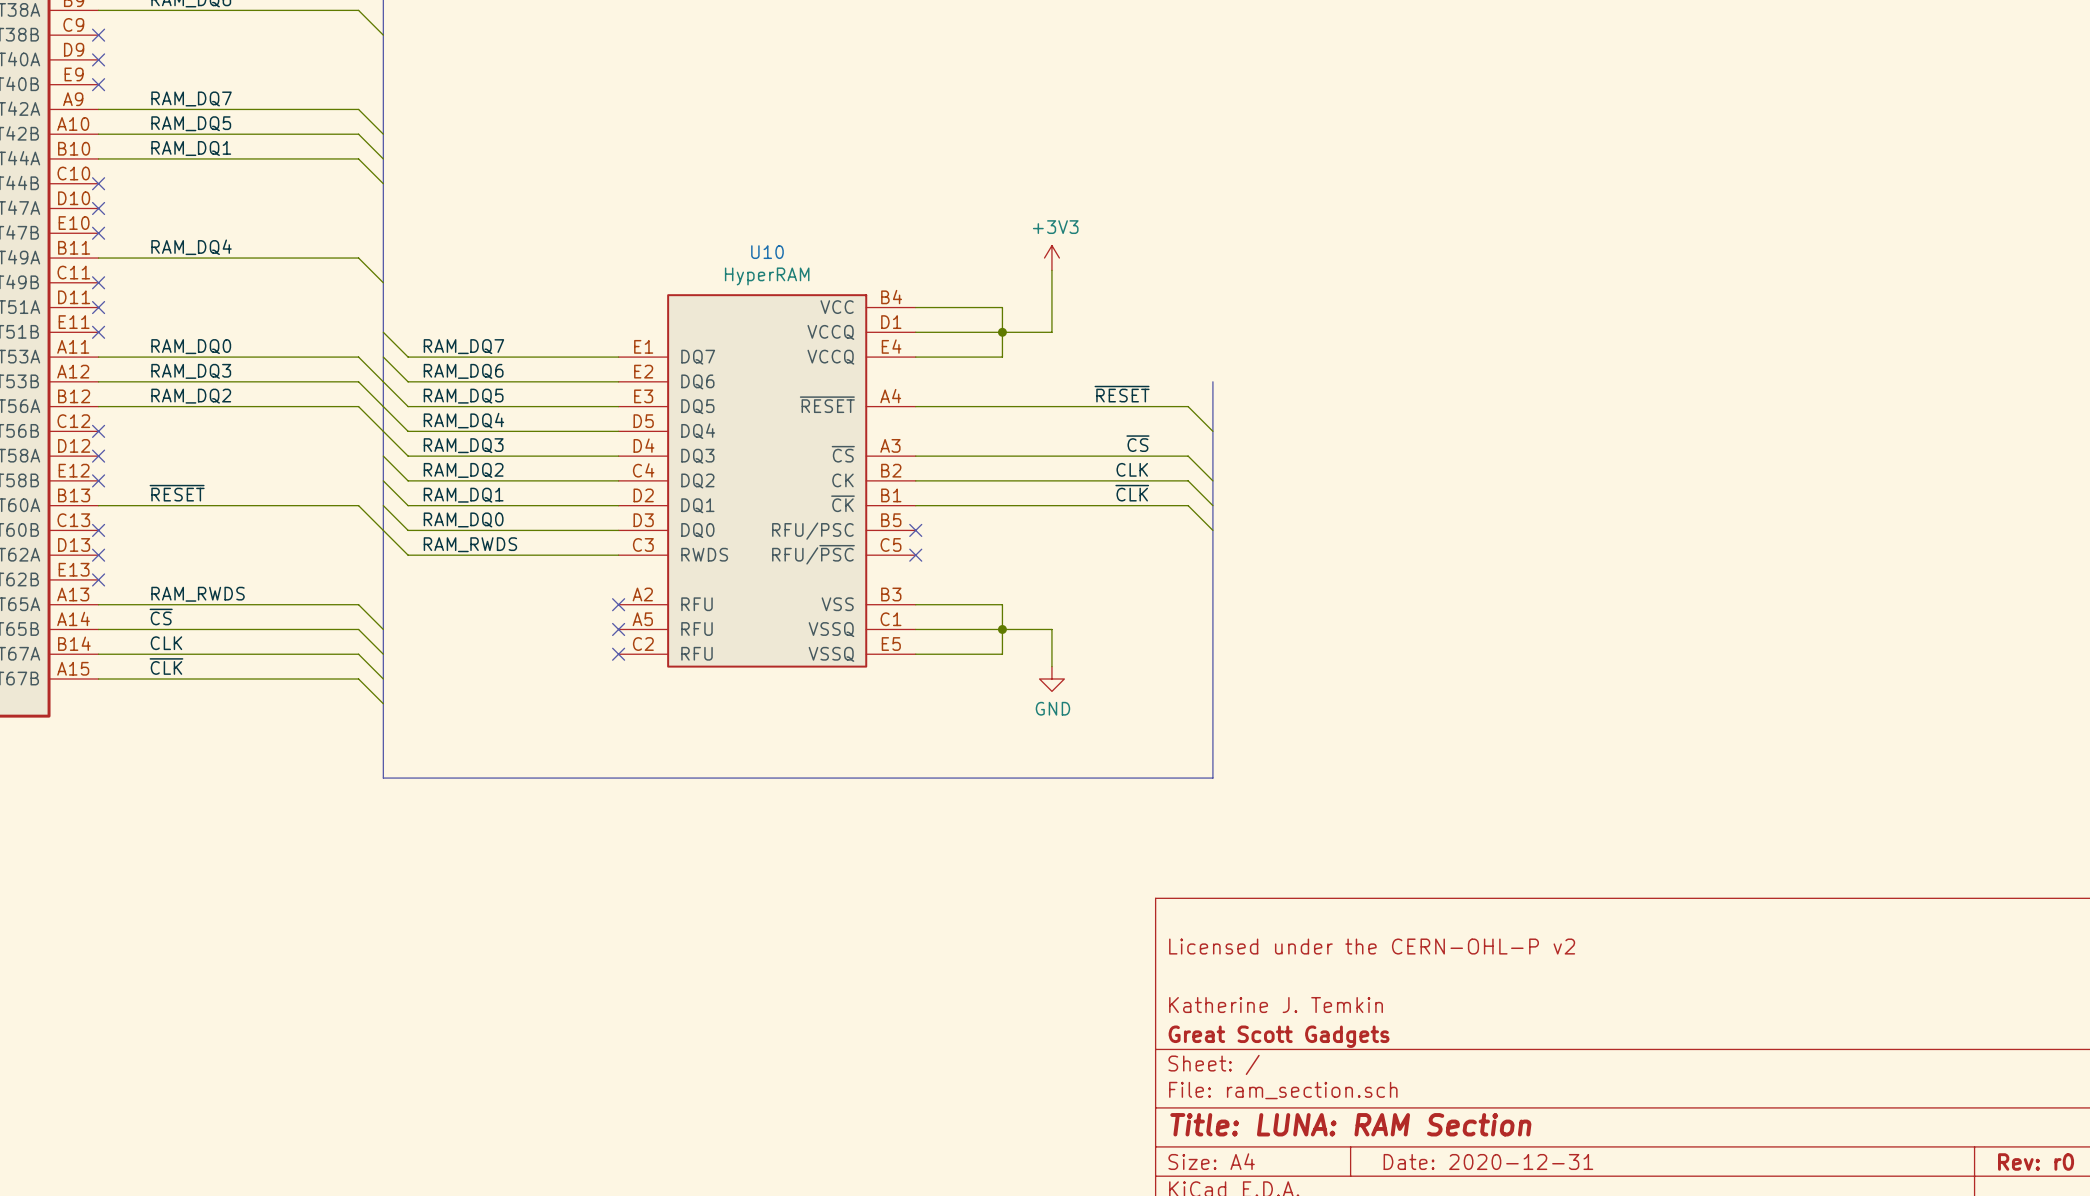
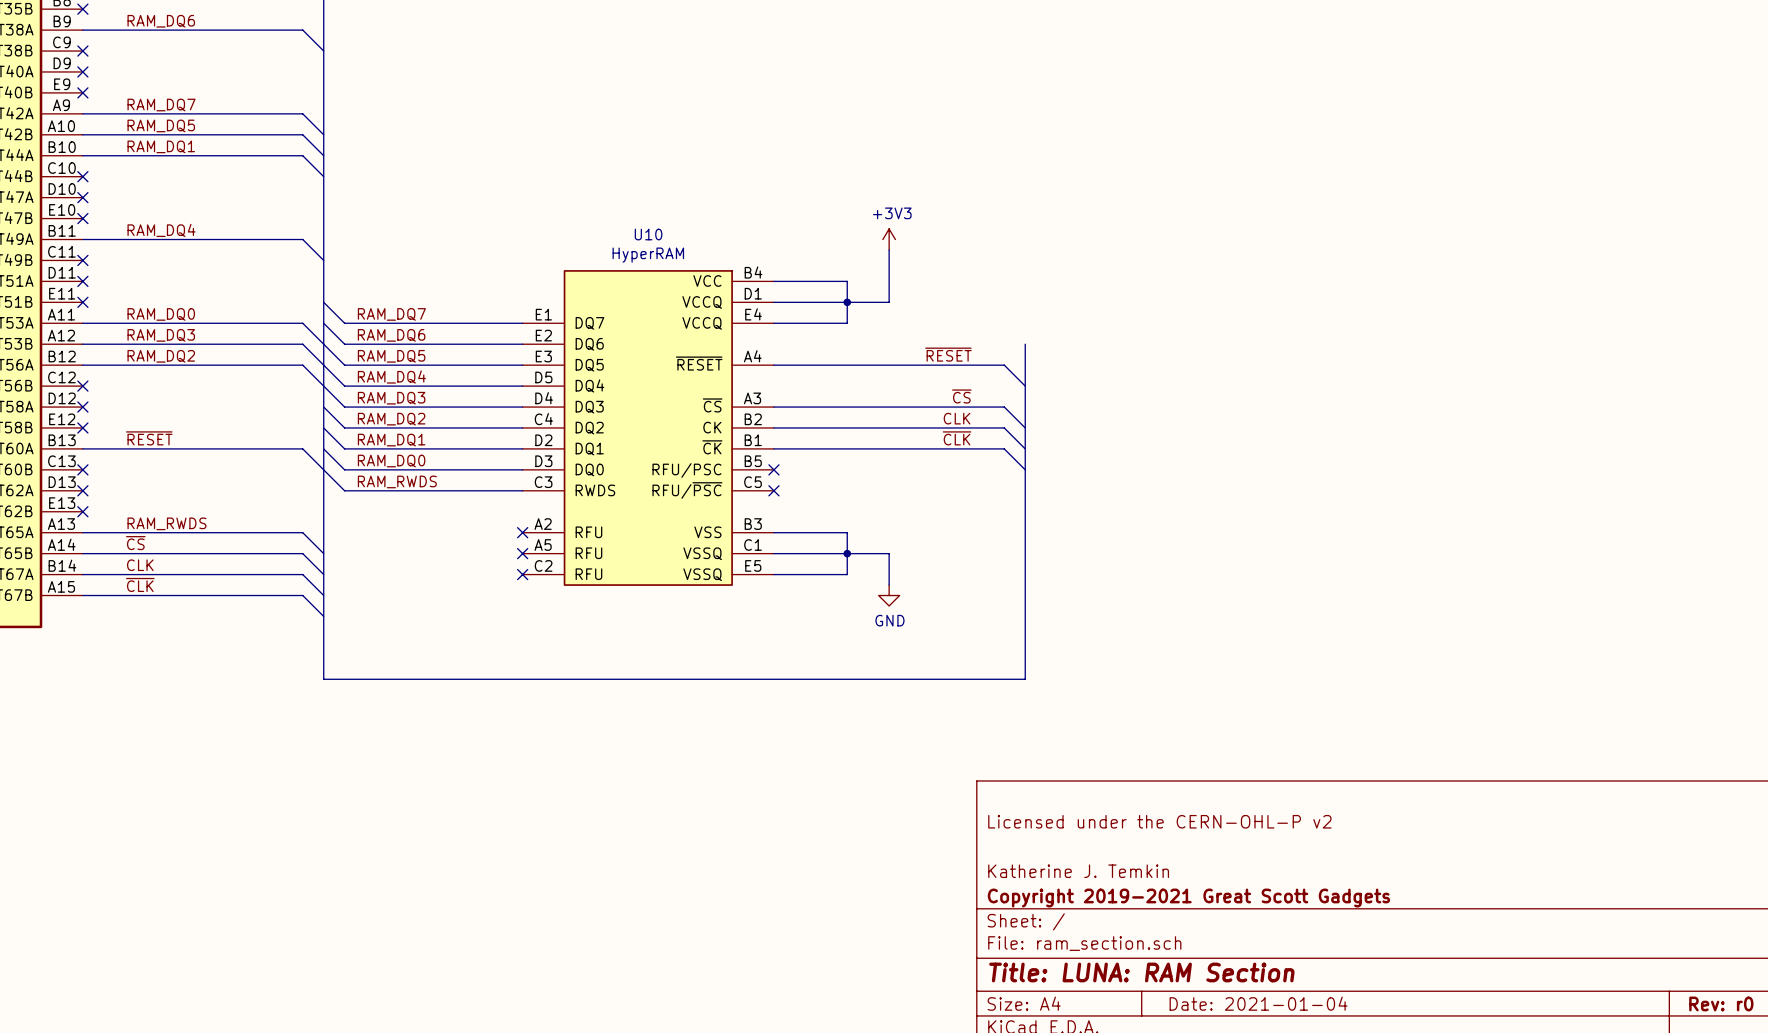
title block: Great Scott Gadgets (1279, 1036) -> Copyright 2019-2021 Great Scott Gadgets (1188, 898)
title block: Date: 2020-12-31 (1488, 1161) -> Date: 2021-01-04 (1258, 1003)

